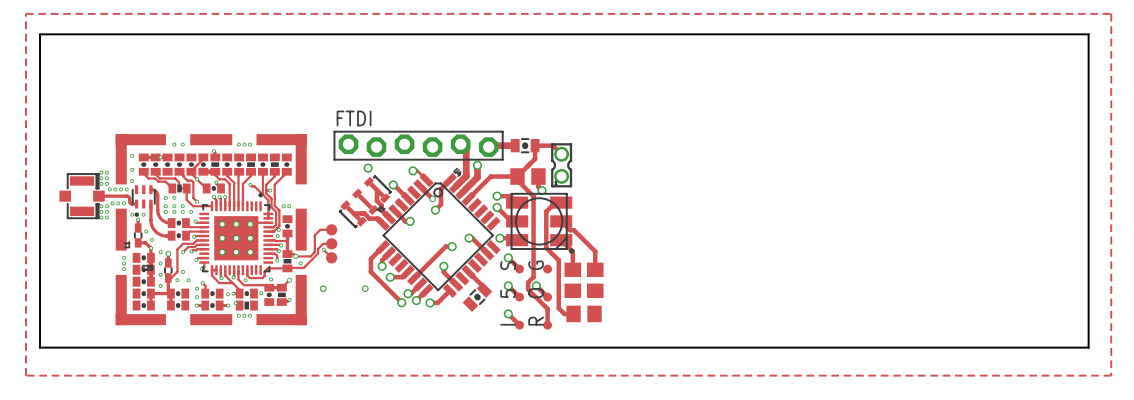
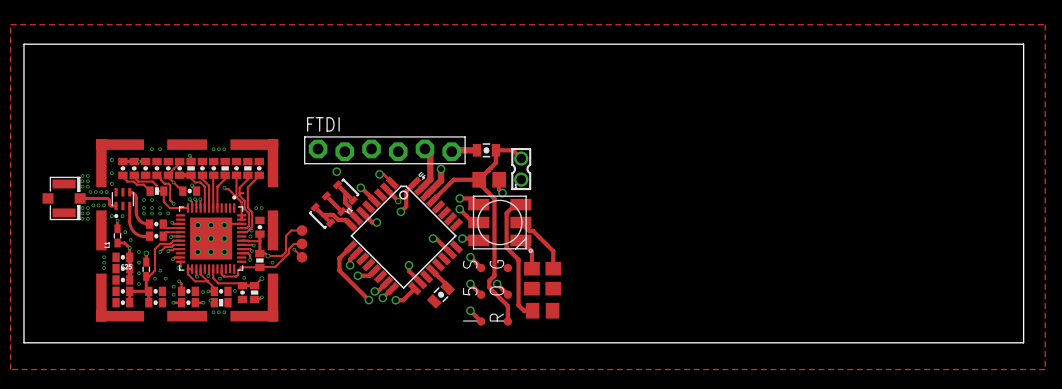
via: (270, 190) -> none
track: (452, 246) (445, 246) (414, 278) -> none
via: (452, 246) -> none
via: (323, 288) -> none
via: (365, 288) -> none

